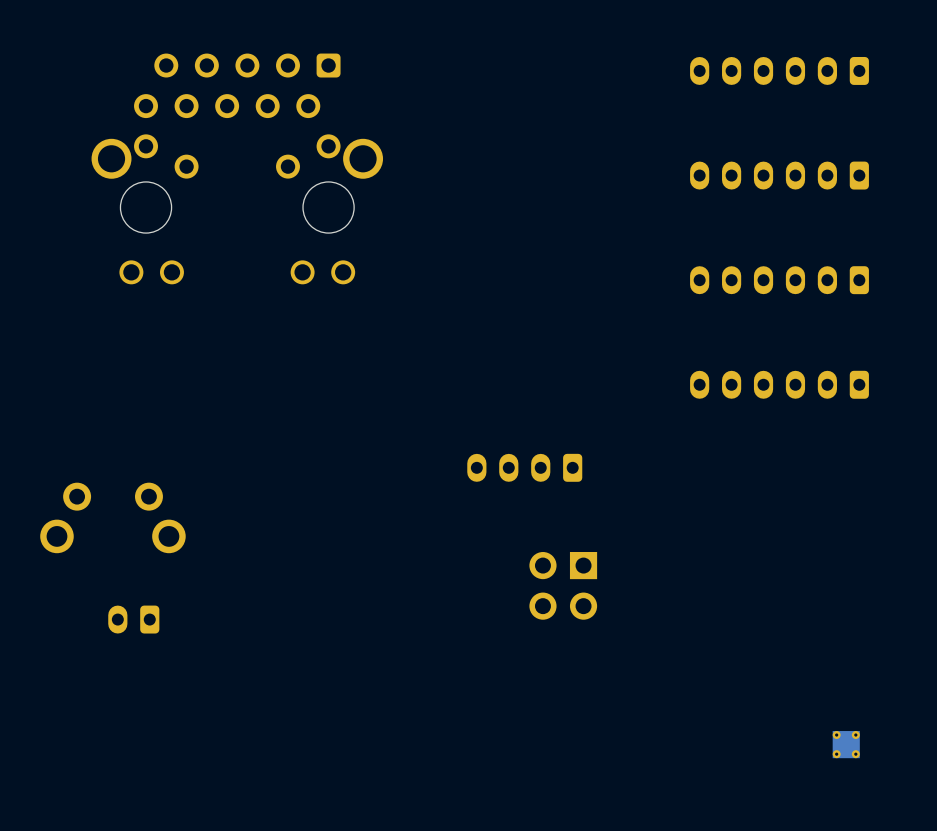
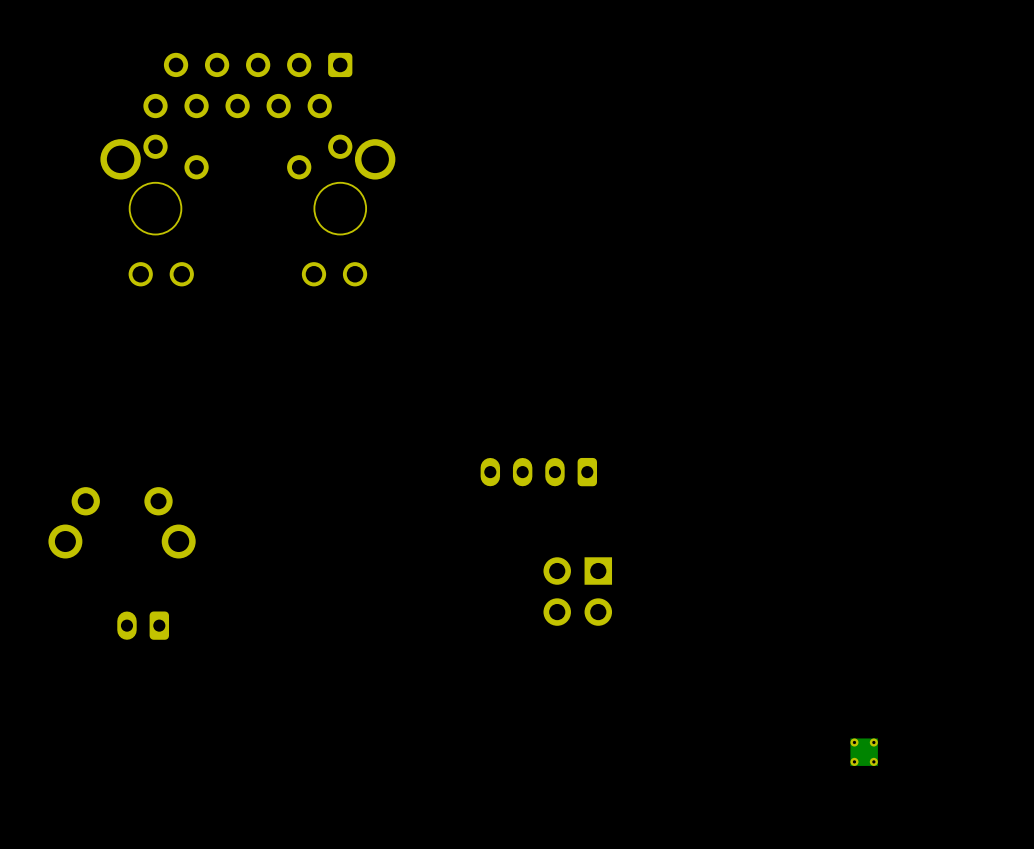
part: (779, 70) -> none
part: (779, 175) -> none
part: (779, 280) -> none
part: (779, 384) -> none

